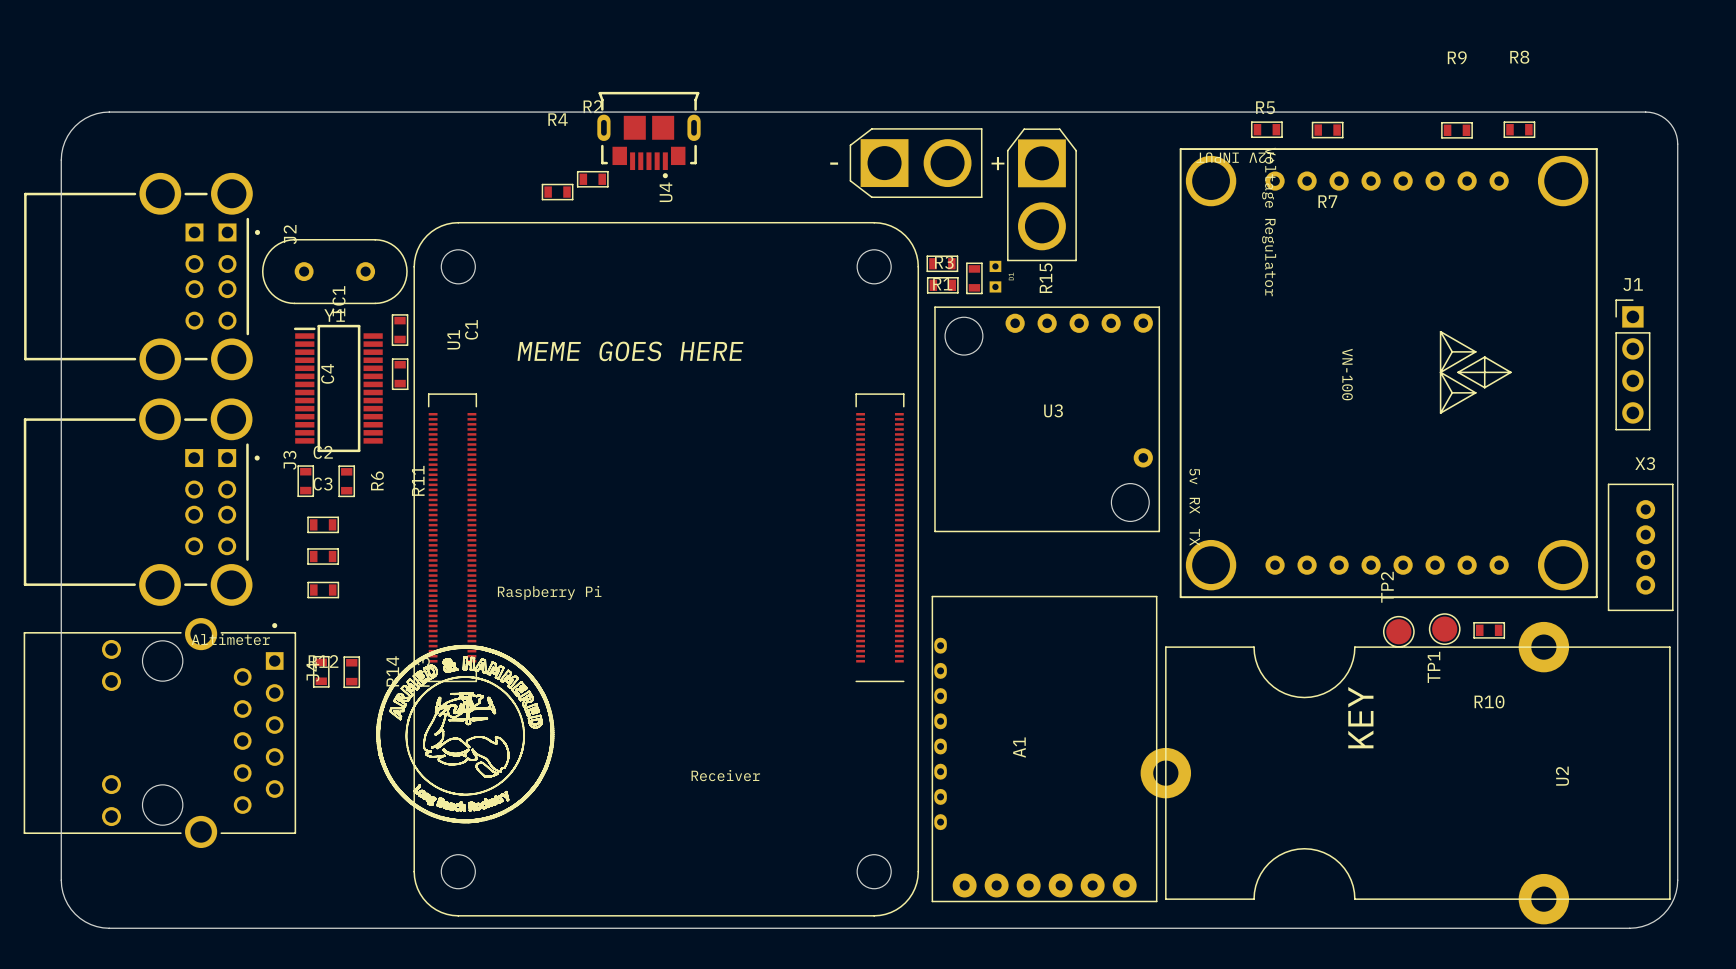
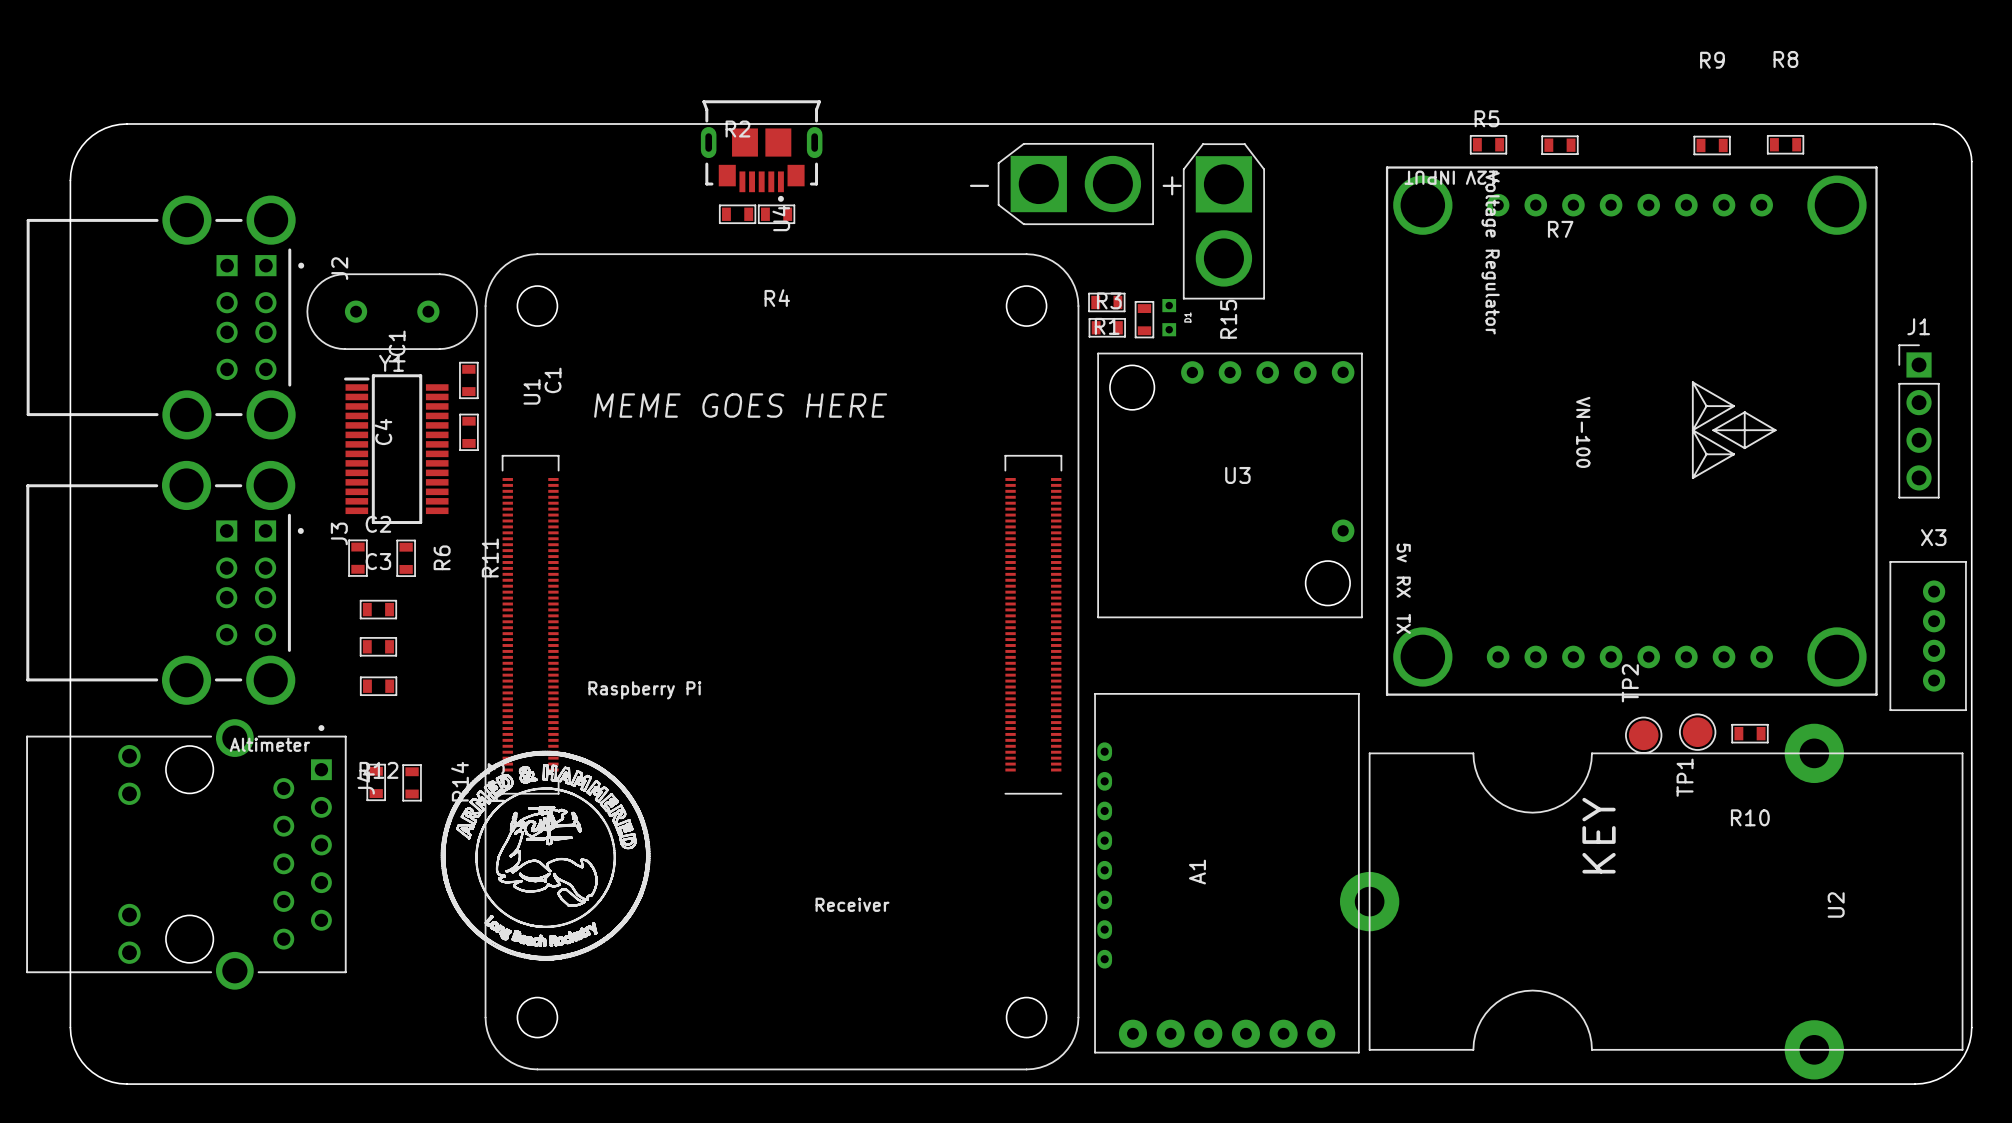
R4 name position: R4 (558, 119) -> R4 (777, 298)
R2 position: (592, 179) -> (737, 214)
R4 position: (557, 192) -> (776, 214)

